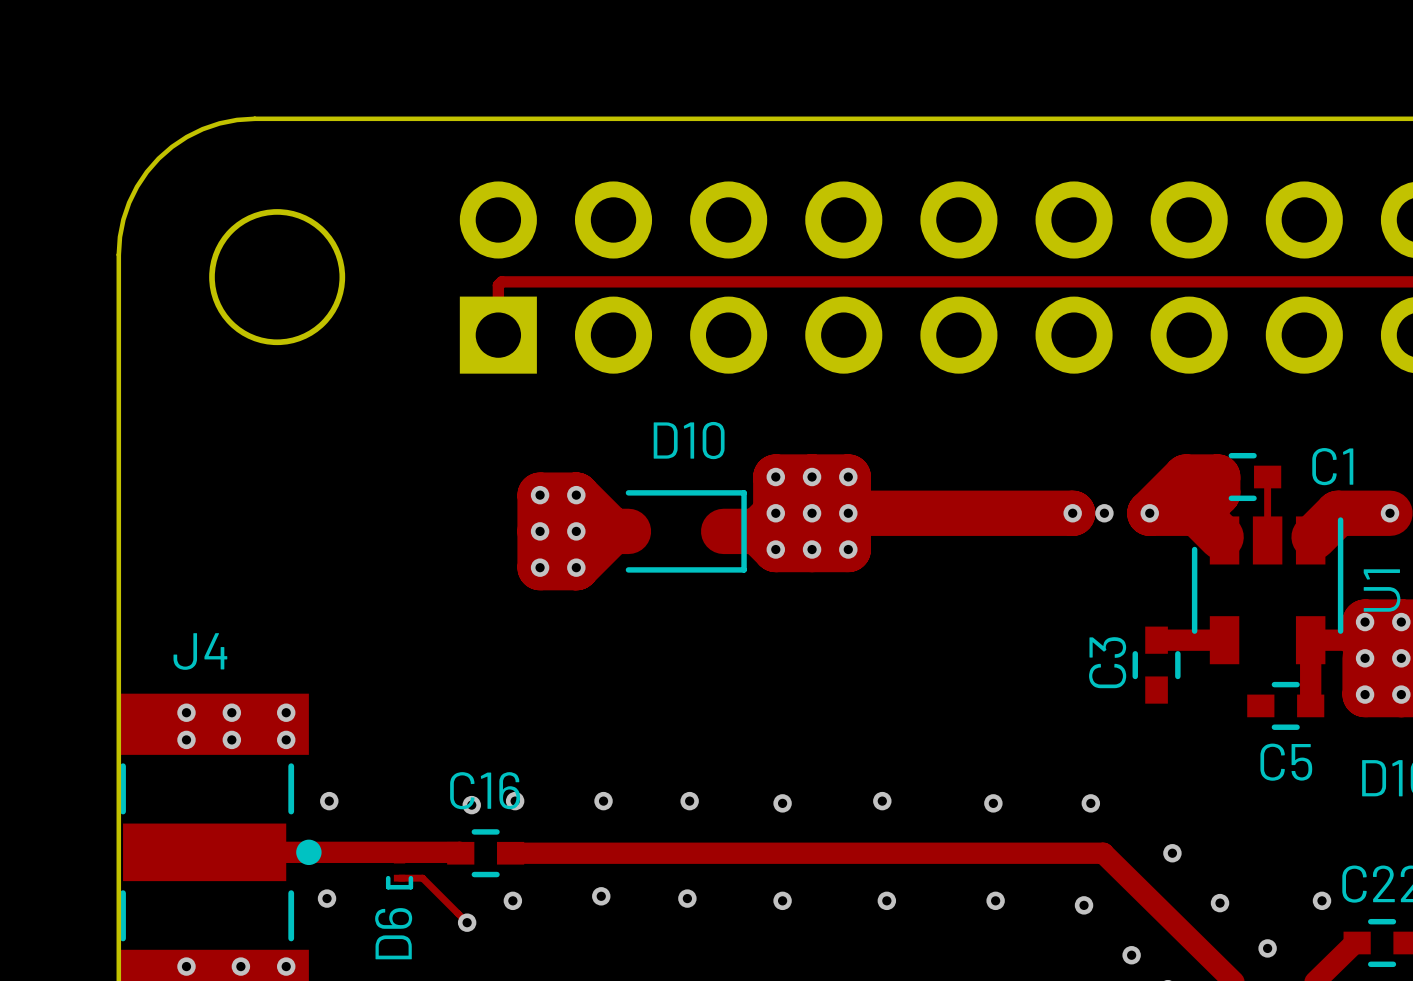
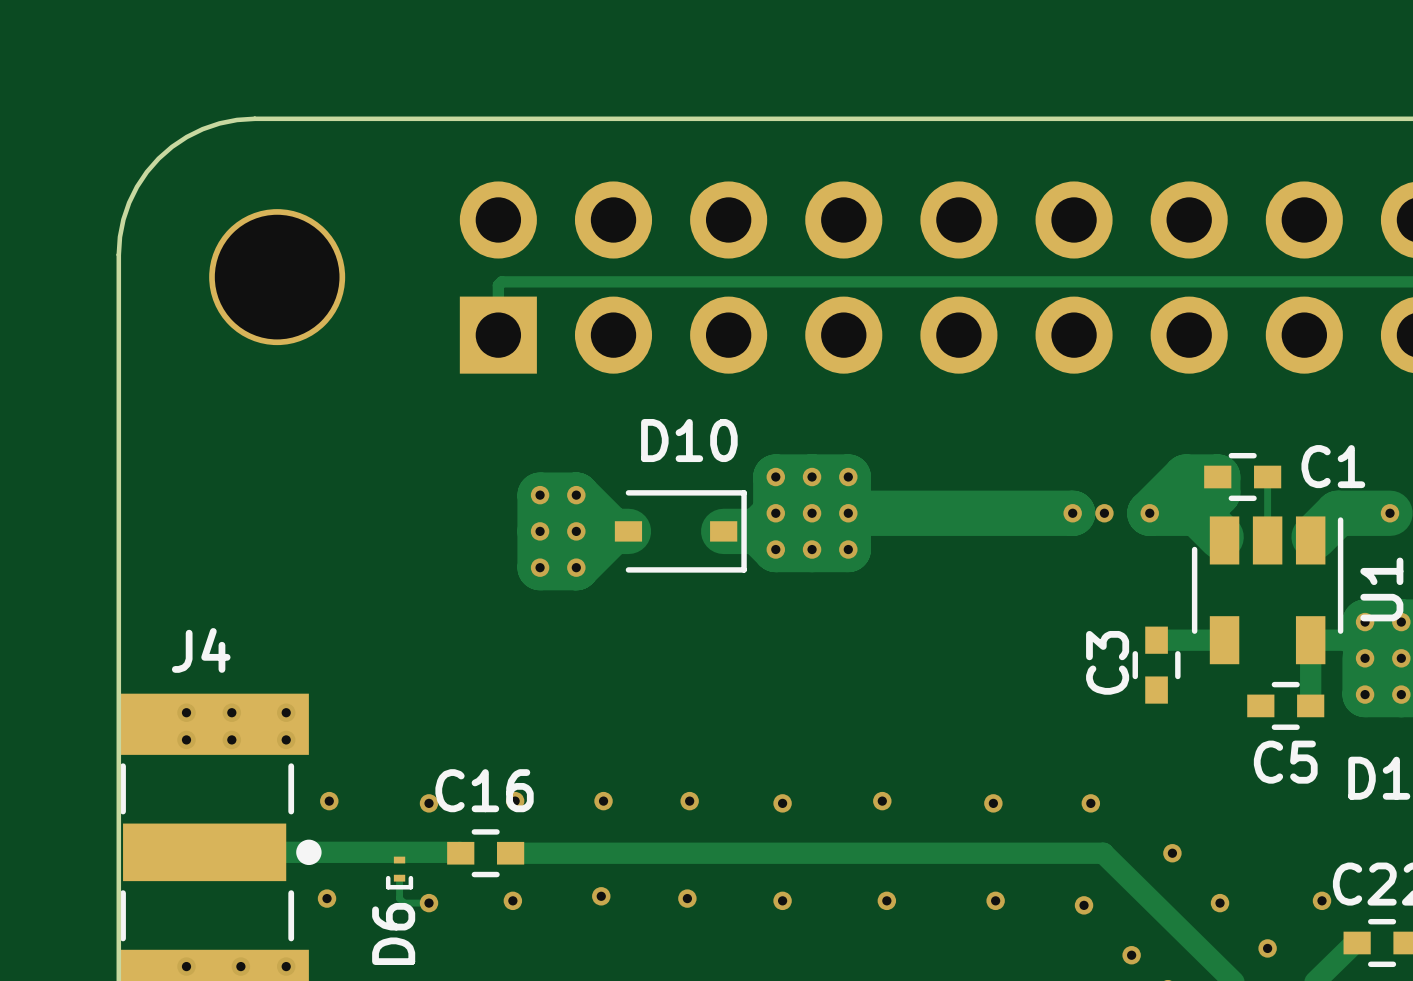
via position: (471, 805) -> (429, 803)
track: (399, 878) (422, 878) (467, 922) -> (399, 878) (399, 898) (404, 903) (429, 903)
via position: (467, 922) -> (429, 903)

